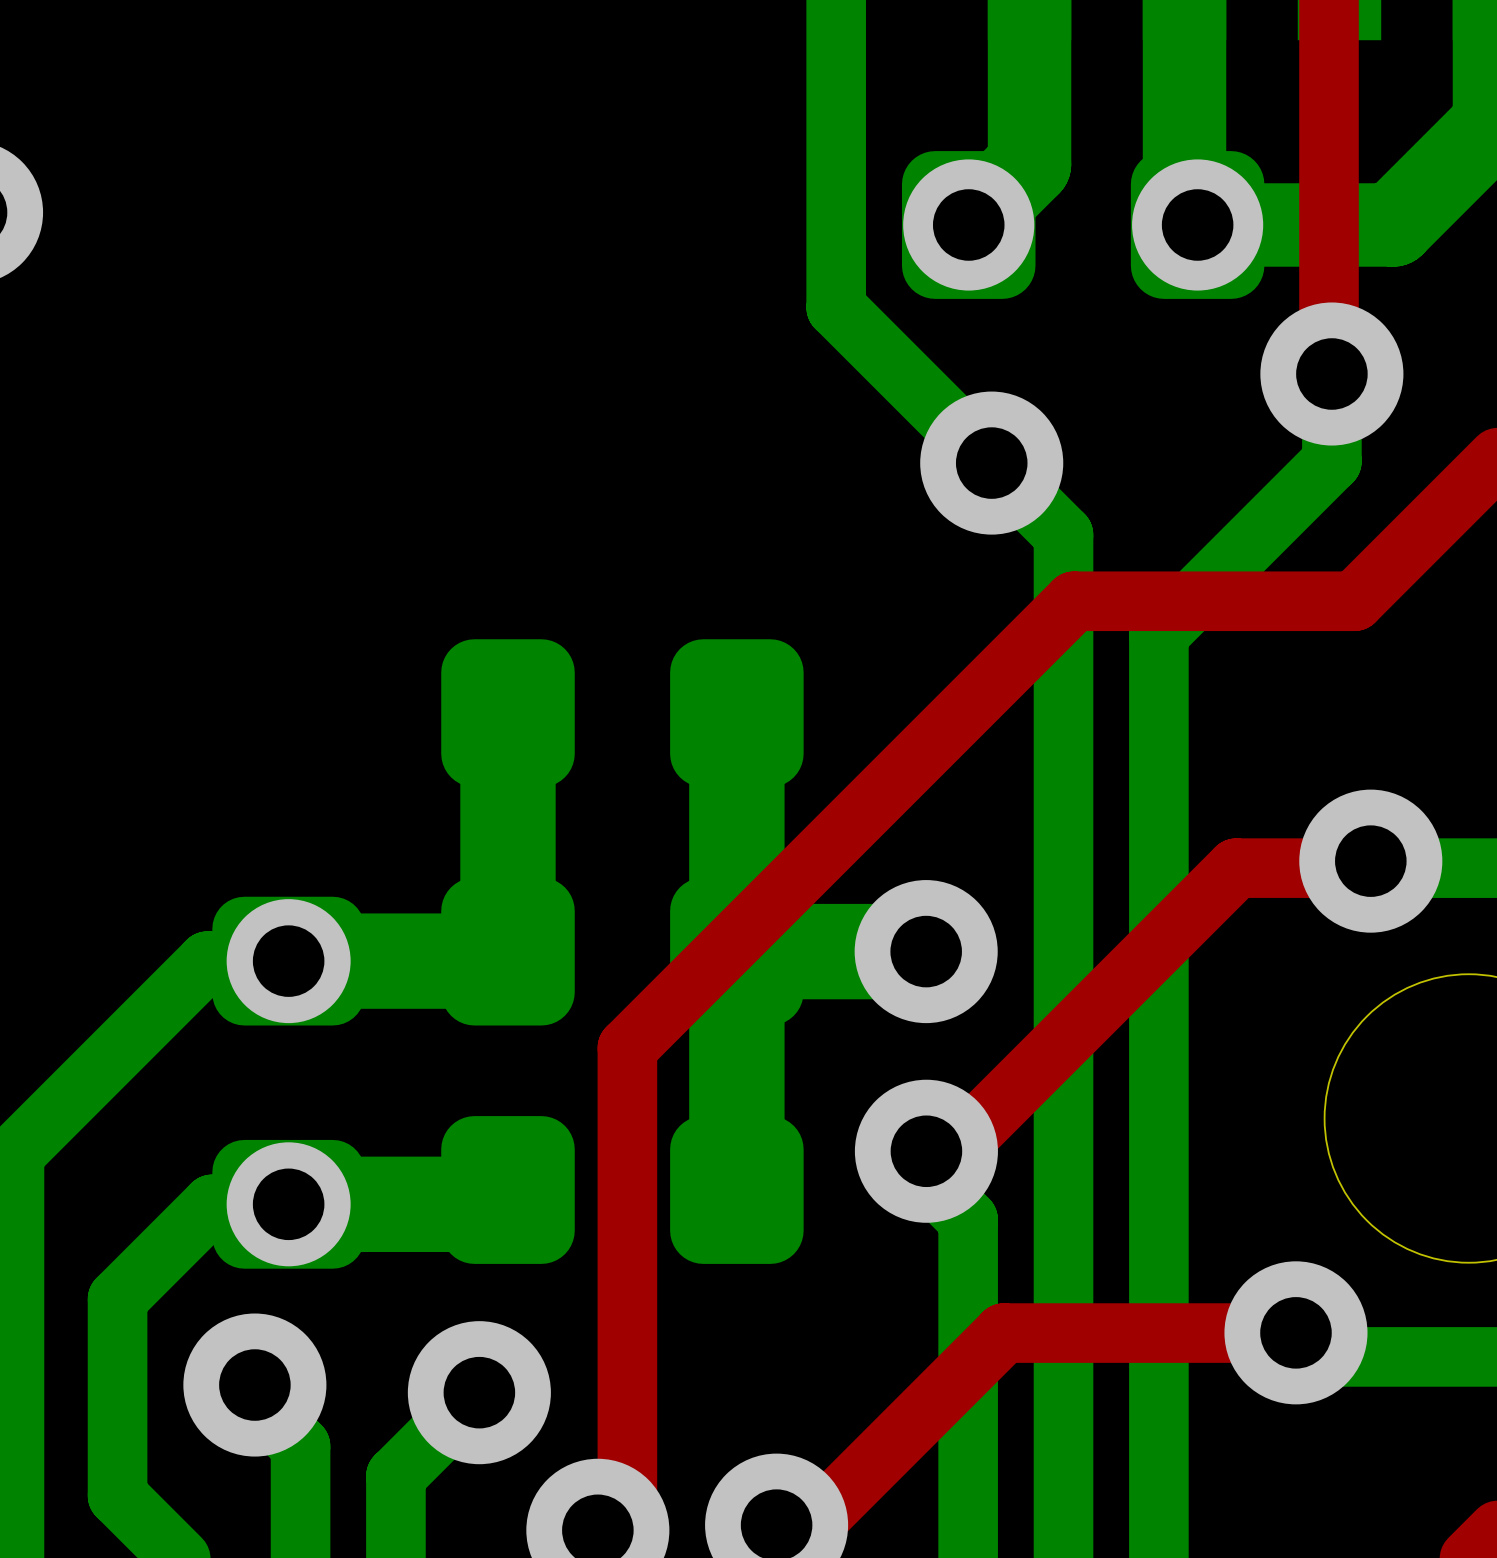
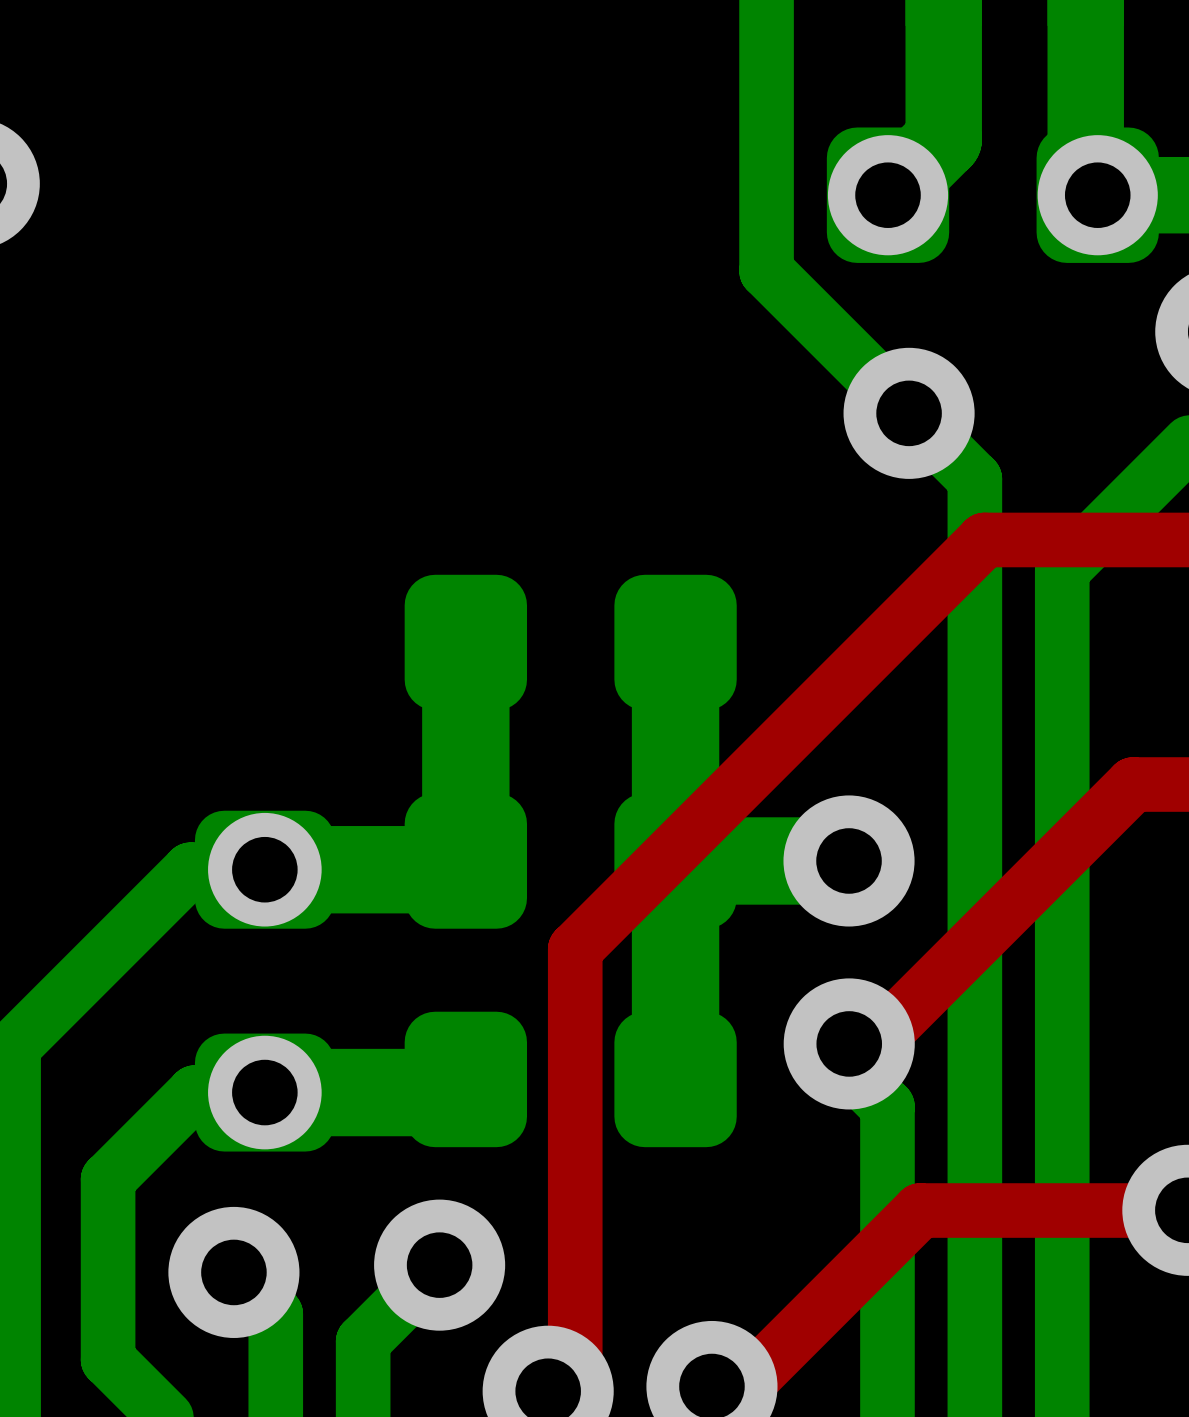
via position: (254, 1385) -> (233, 1272)

